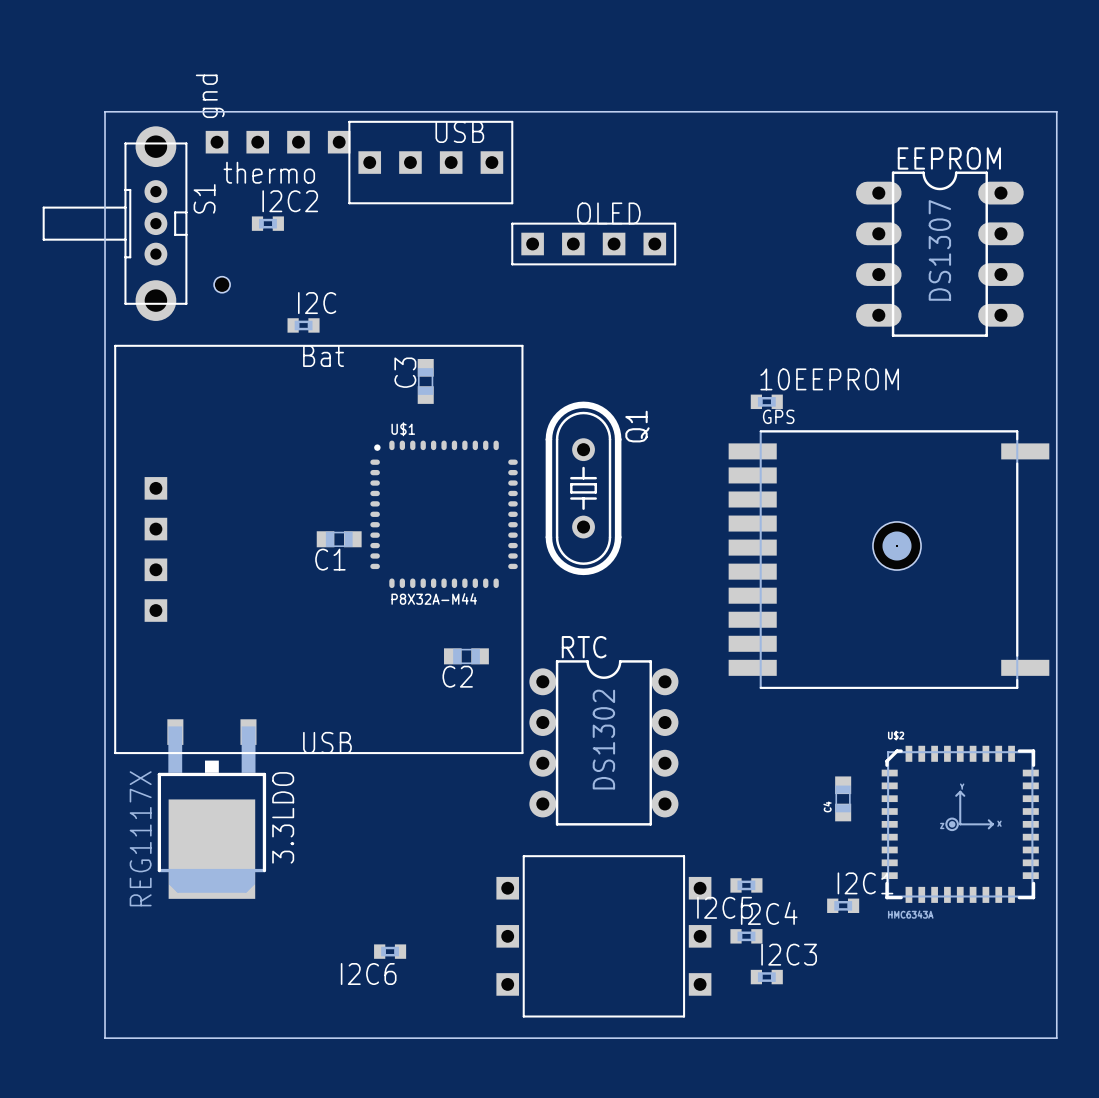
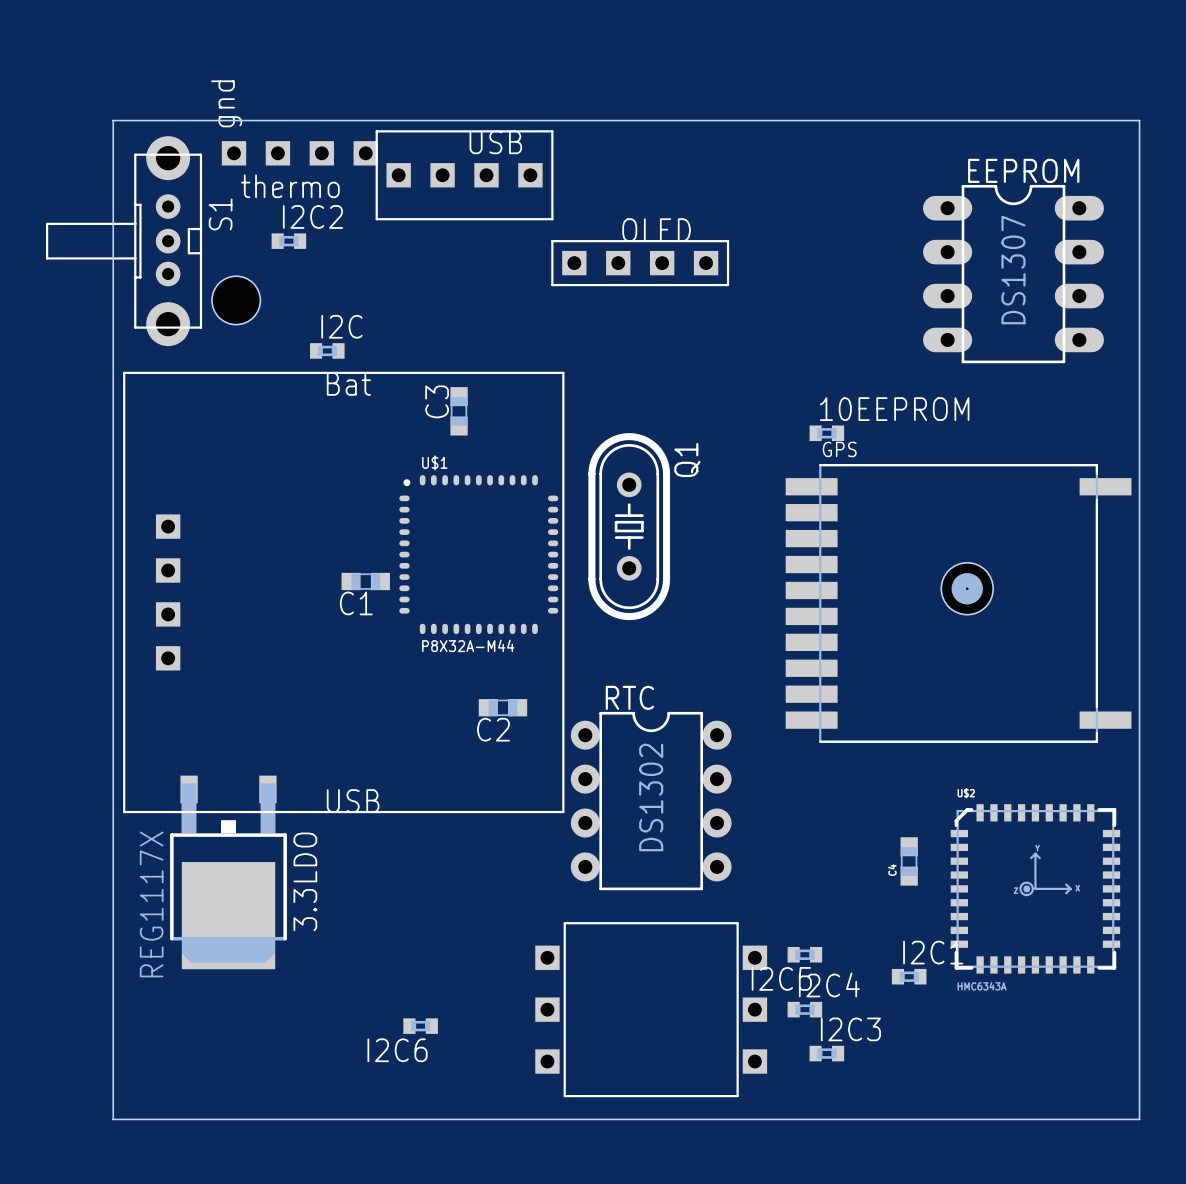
hole size: [214, 276, 231, 293] -> [211, 276, 261, 325]

